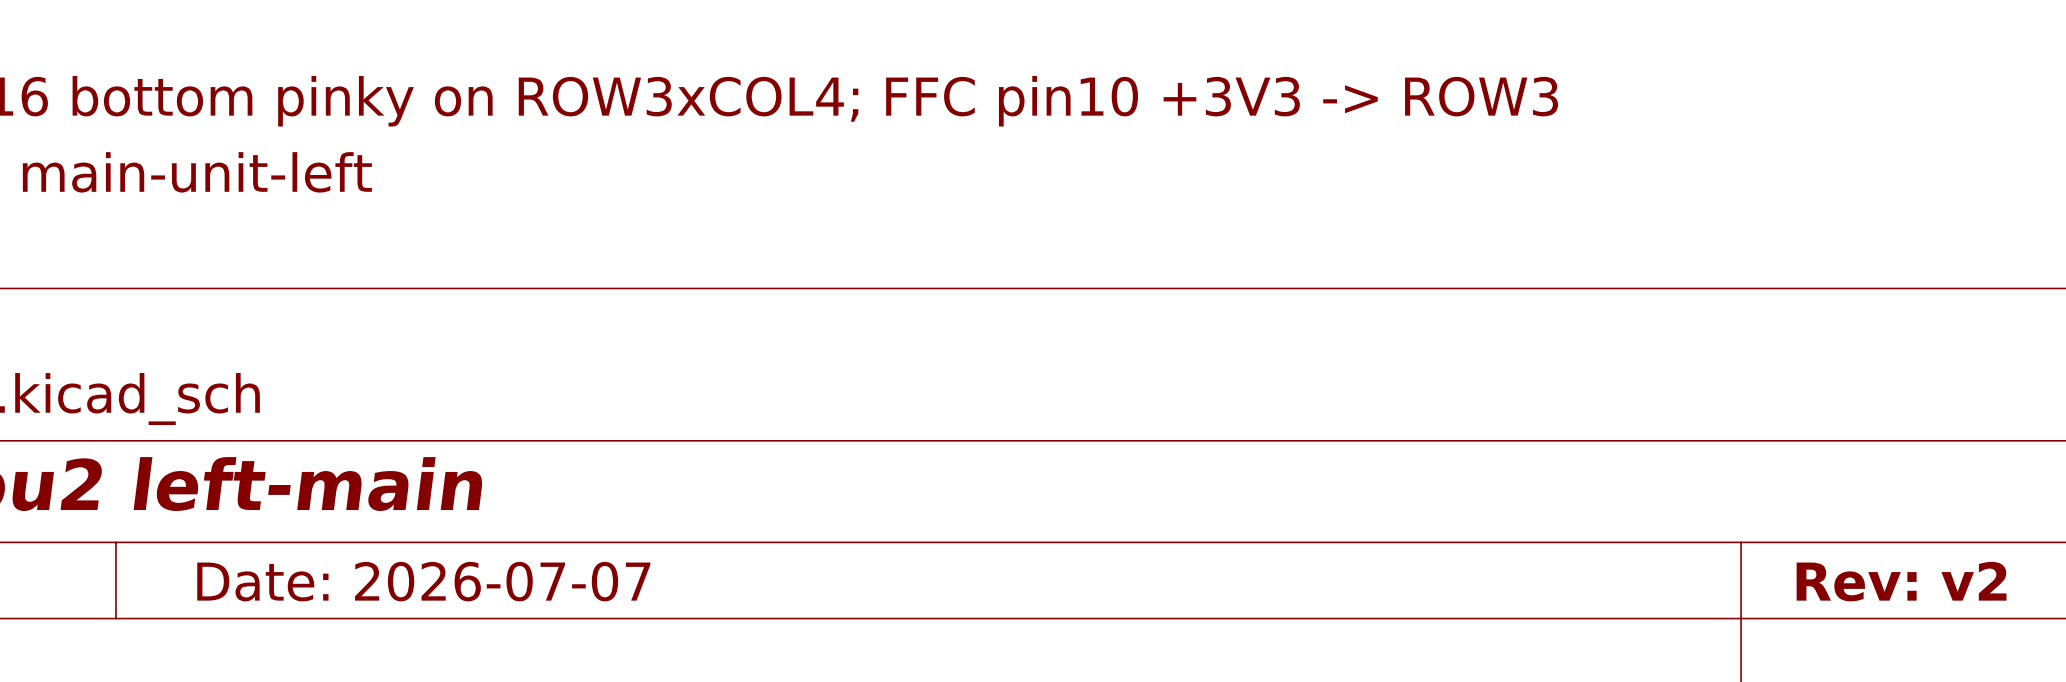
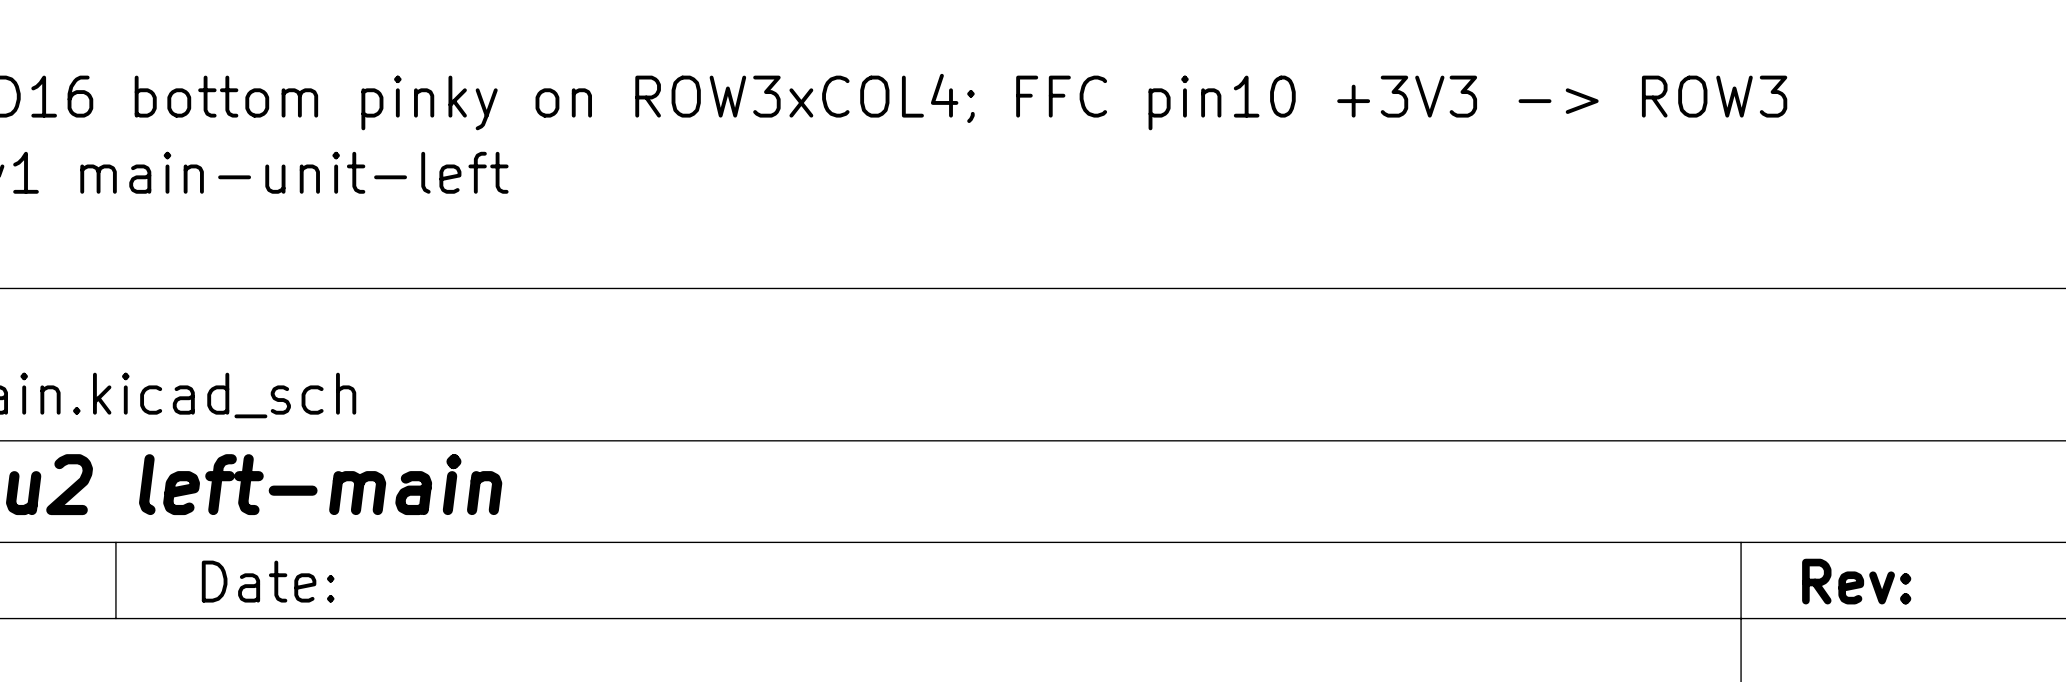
title block: Date: 2026-07-07 (423, 581) -> Date: (268, 581)
title block: Rev: v2 (1901, 581) -> Rev: (1856, 581)

